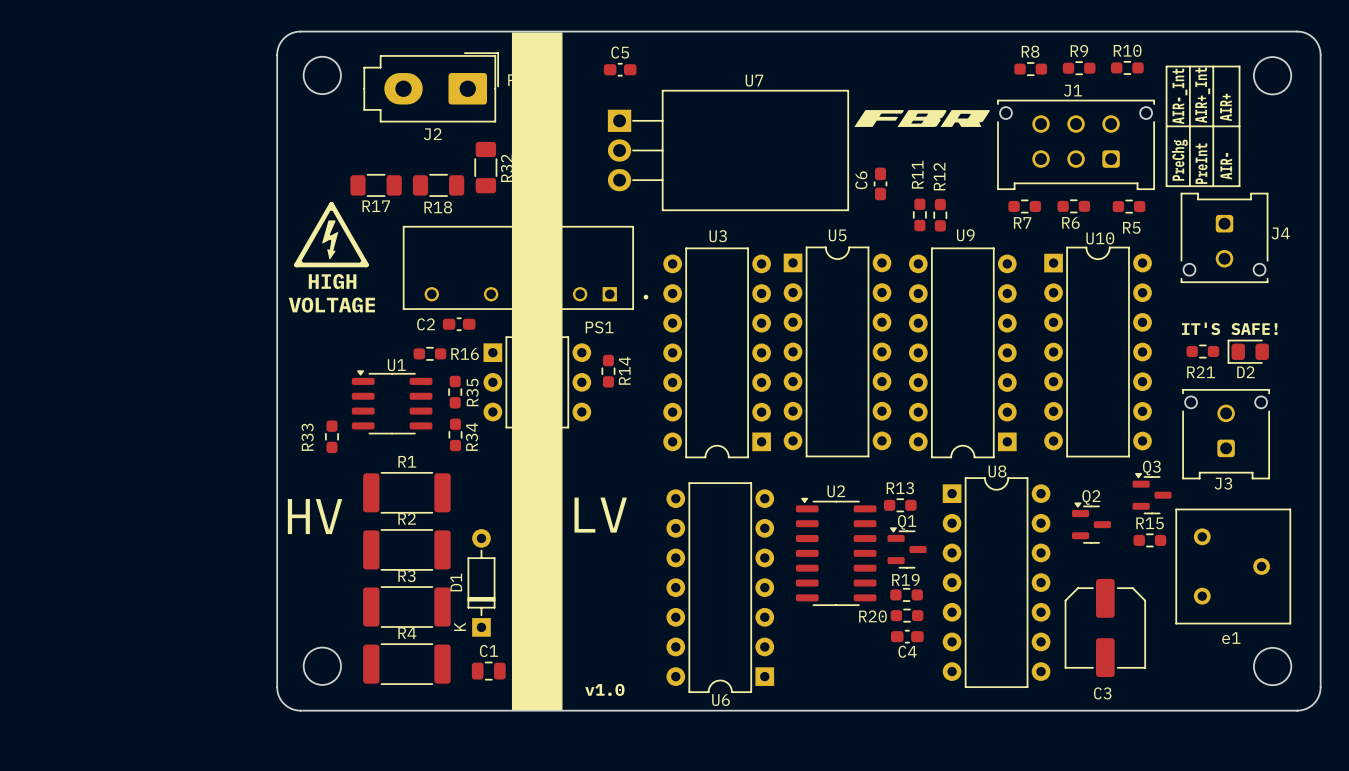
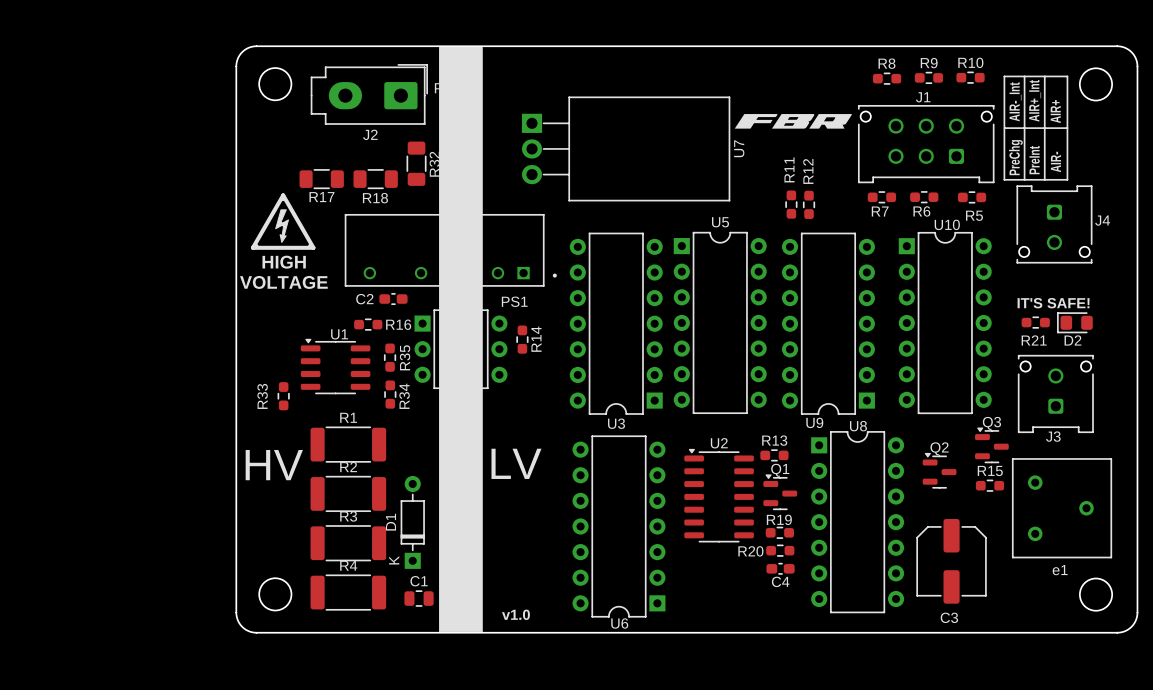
C5: (620, 69) -> none
U7 name rotation: 0° (754, 80) -> 90° counterclockwise (739, 148)
U7 name position: U7 (754, 80) -> U7 (739, 148)
C6: (880, 183) -> none
U9 name position: U9 (965, 235) -> U9 (814, 422)
U3 name position: U3 (718, 236) -> U3 (616, 423)

